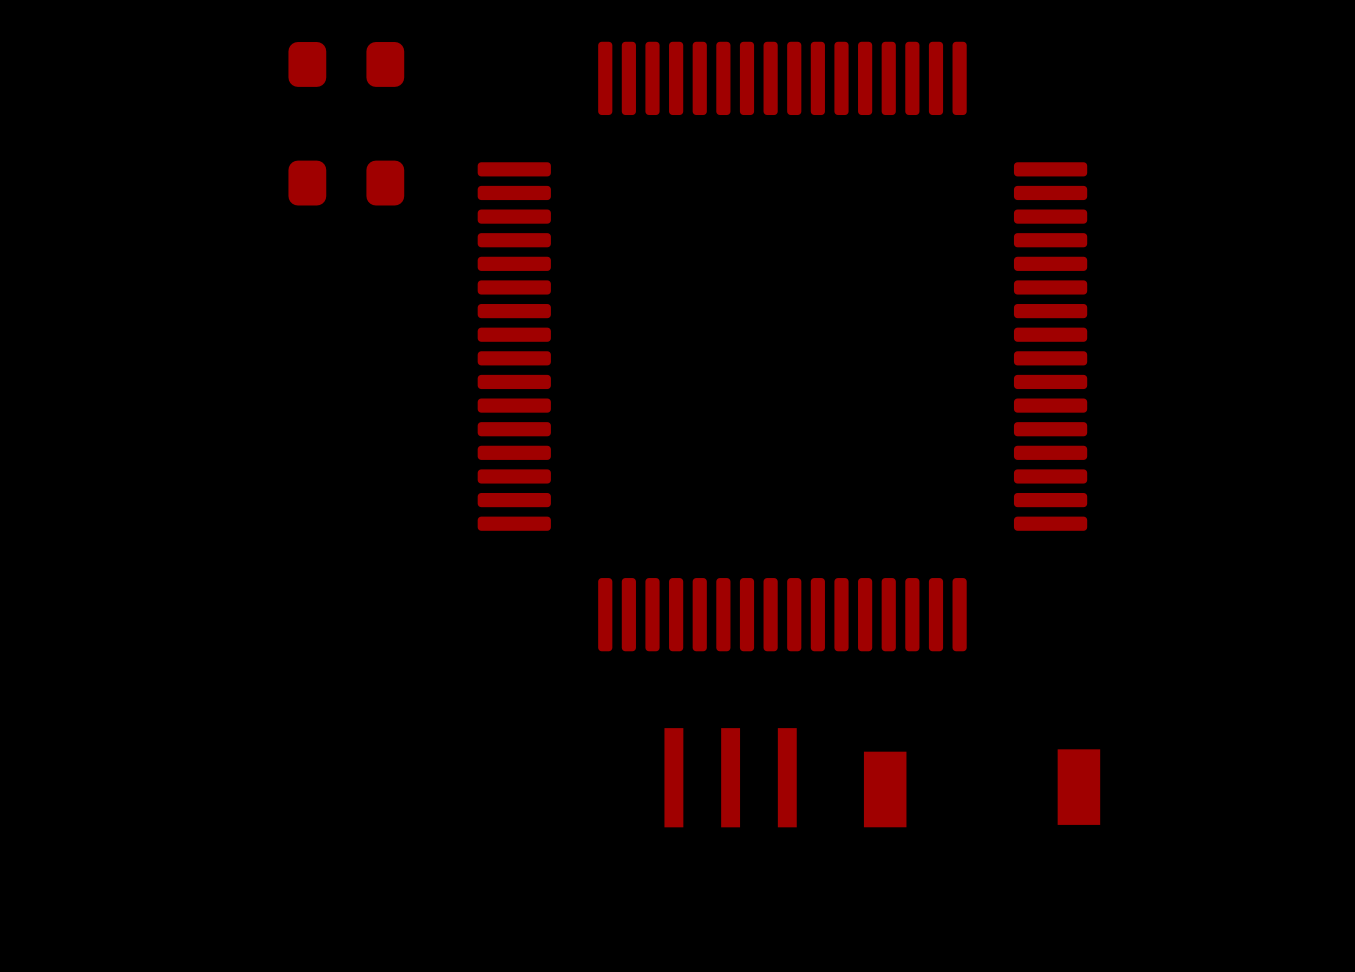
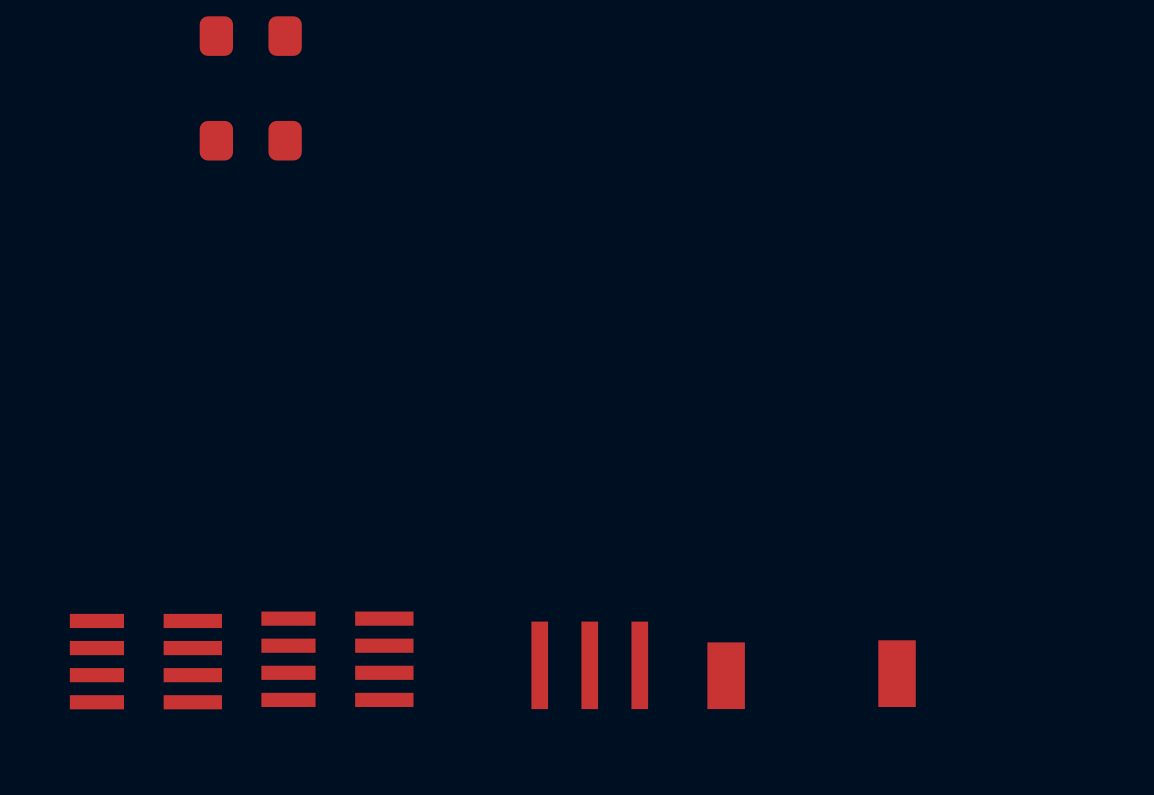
part: (782, 346) -> none
part: none -> (337, 659)
part: none -> (145, 661)

